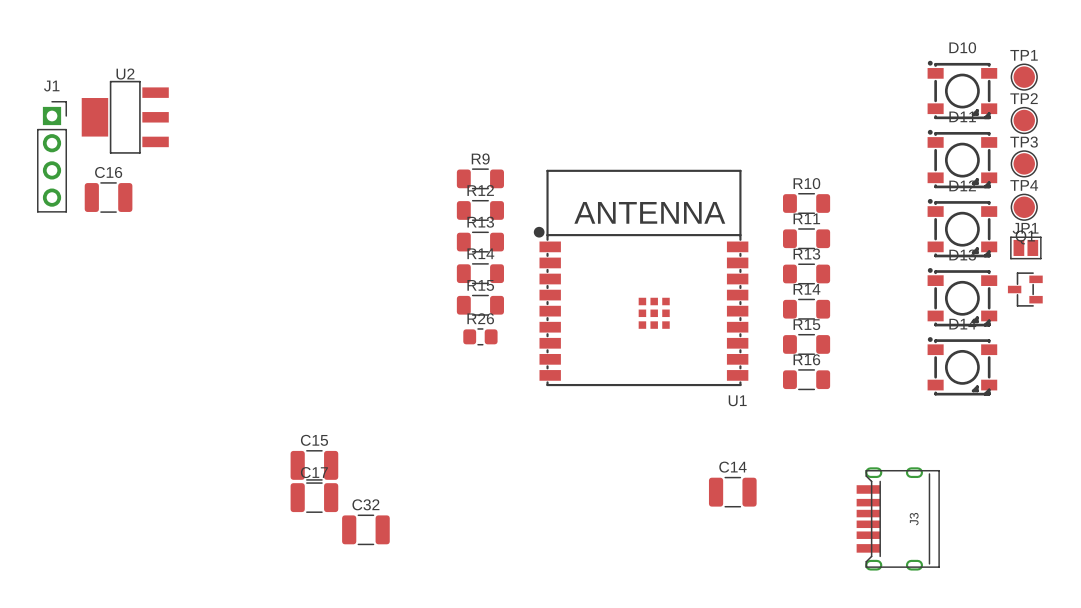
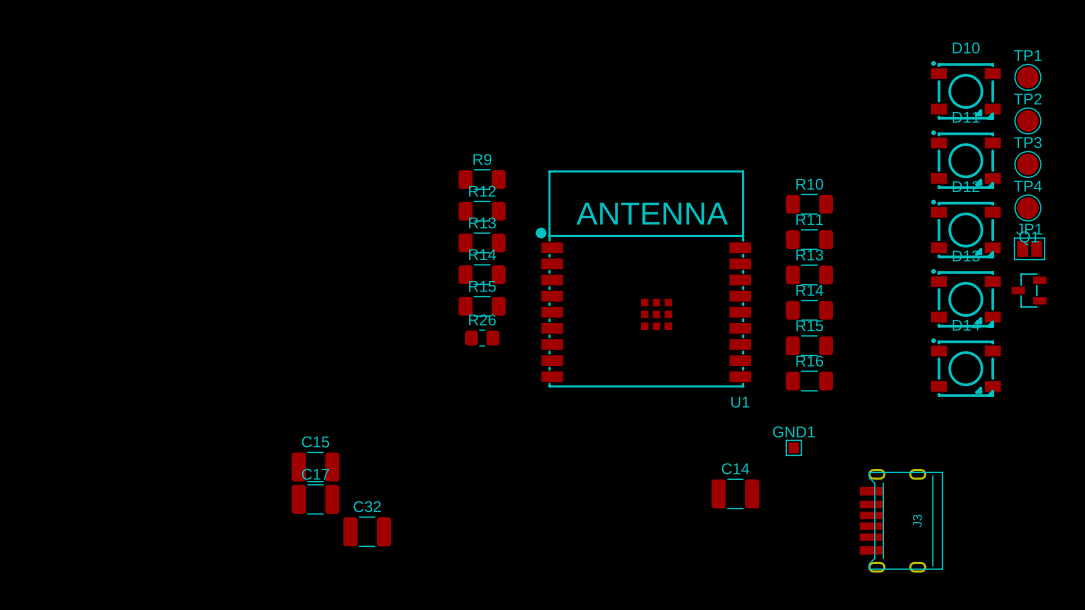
U2: (125, 117) -> none
J1: (52, 156) -> none
C16: (108, 197) -> none
GND1: none -> (793, 447)

